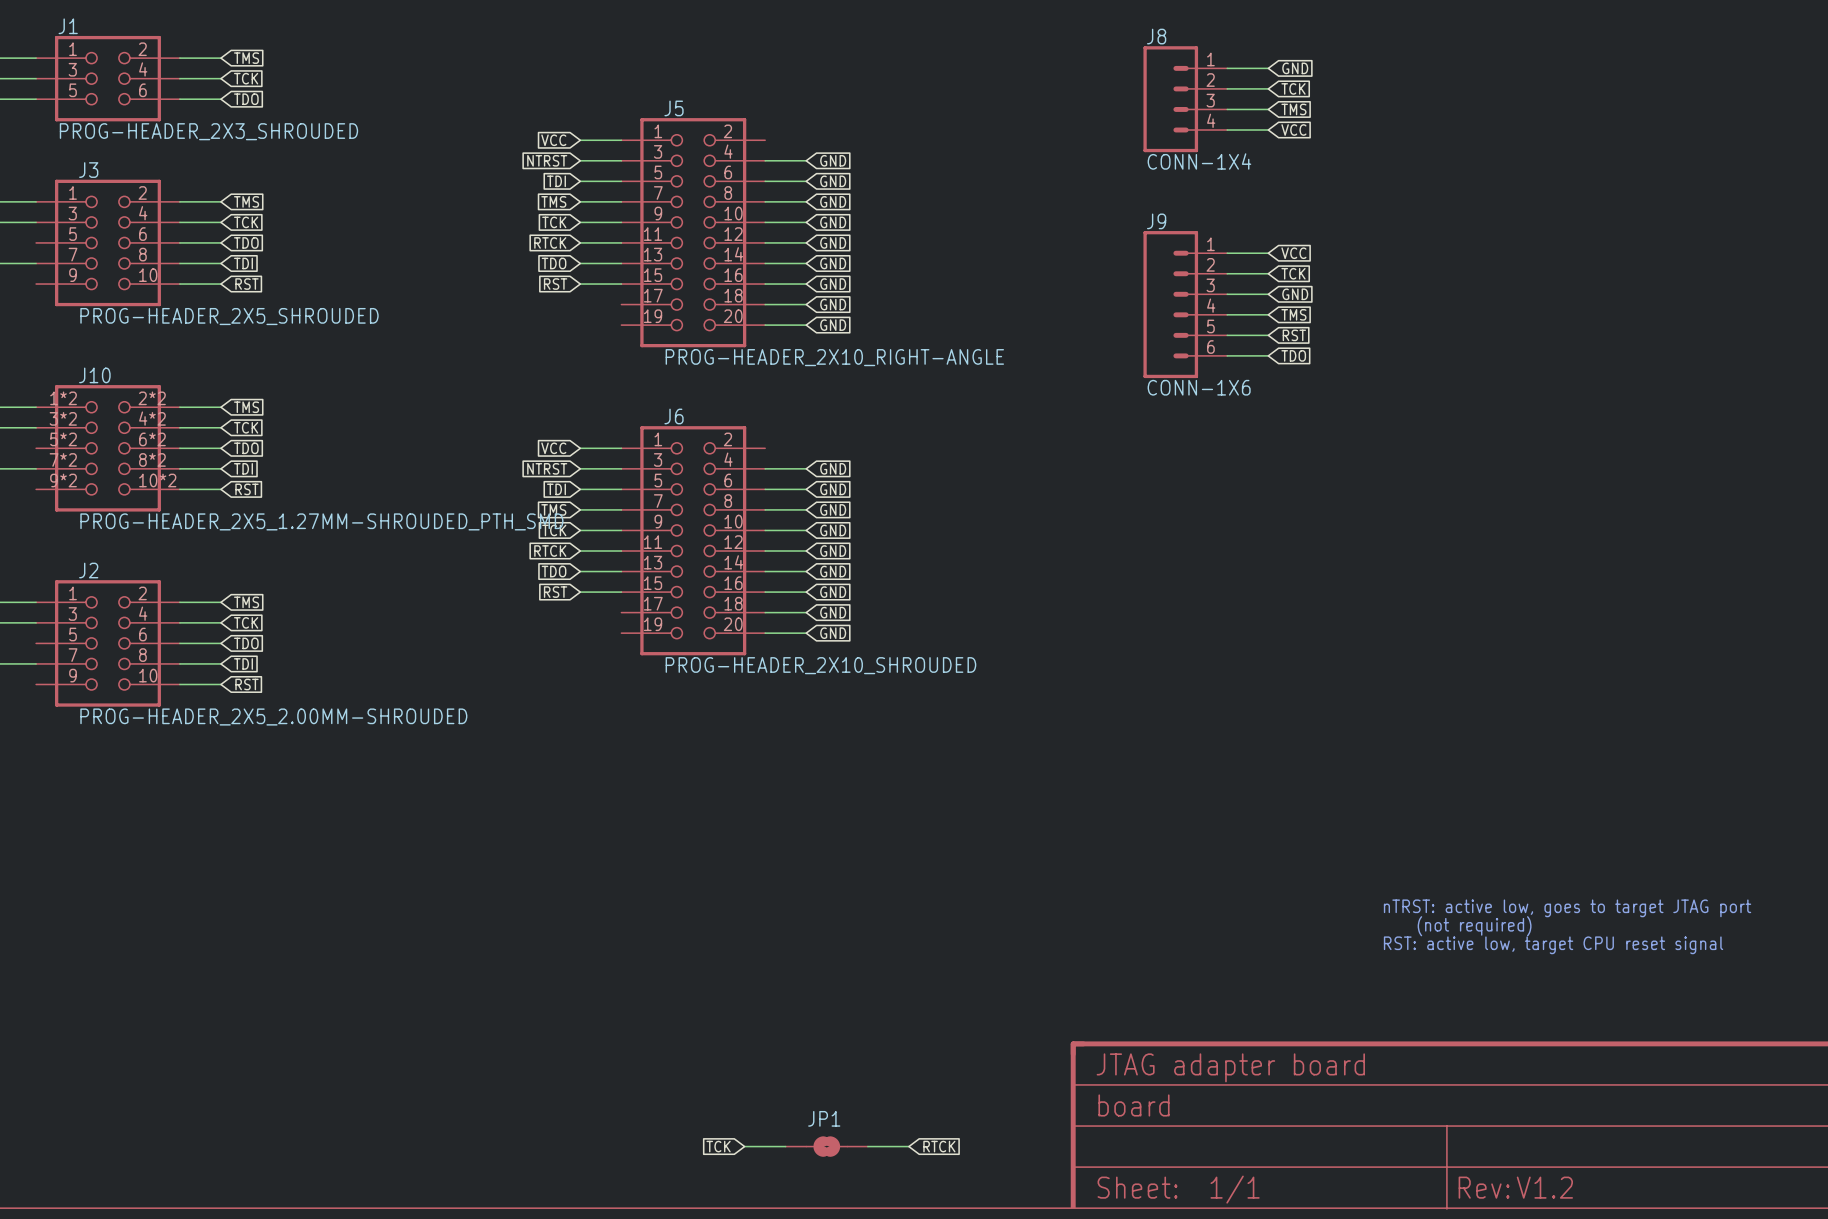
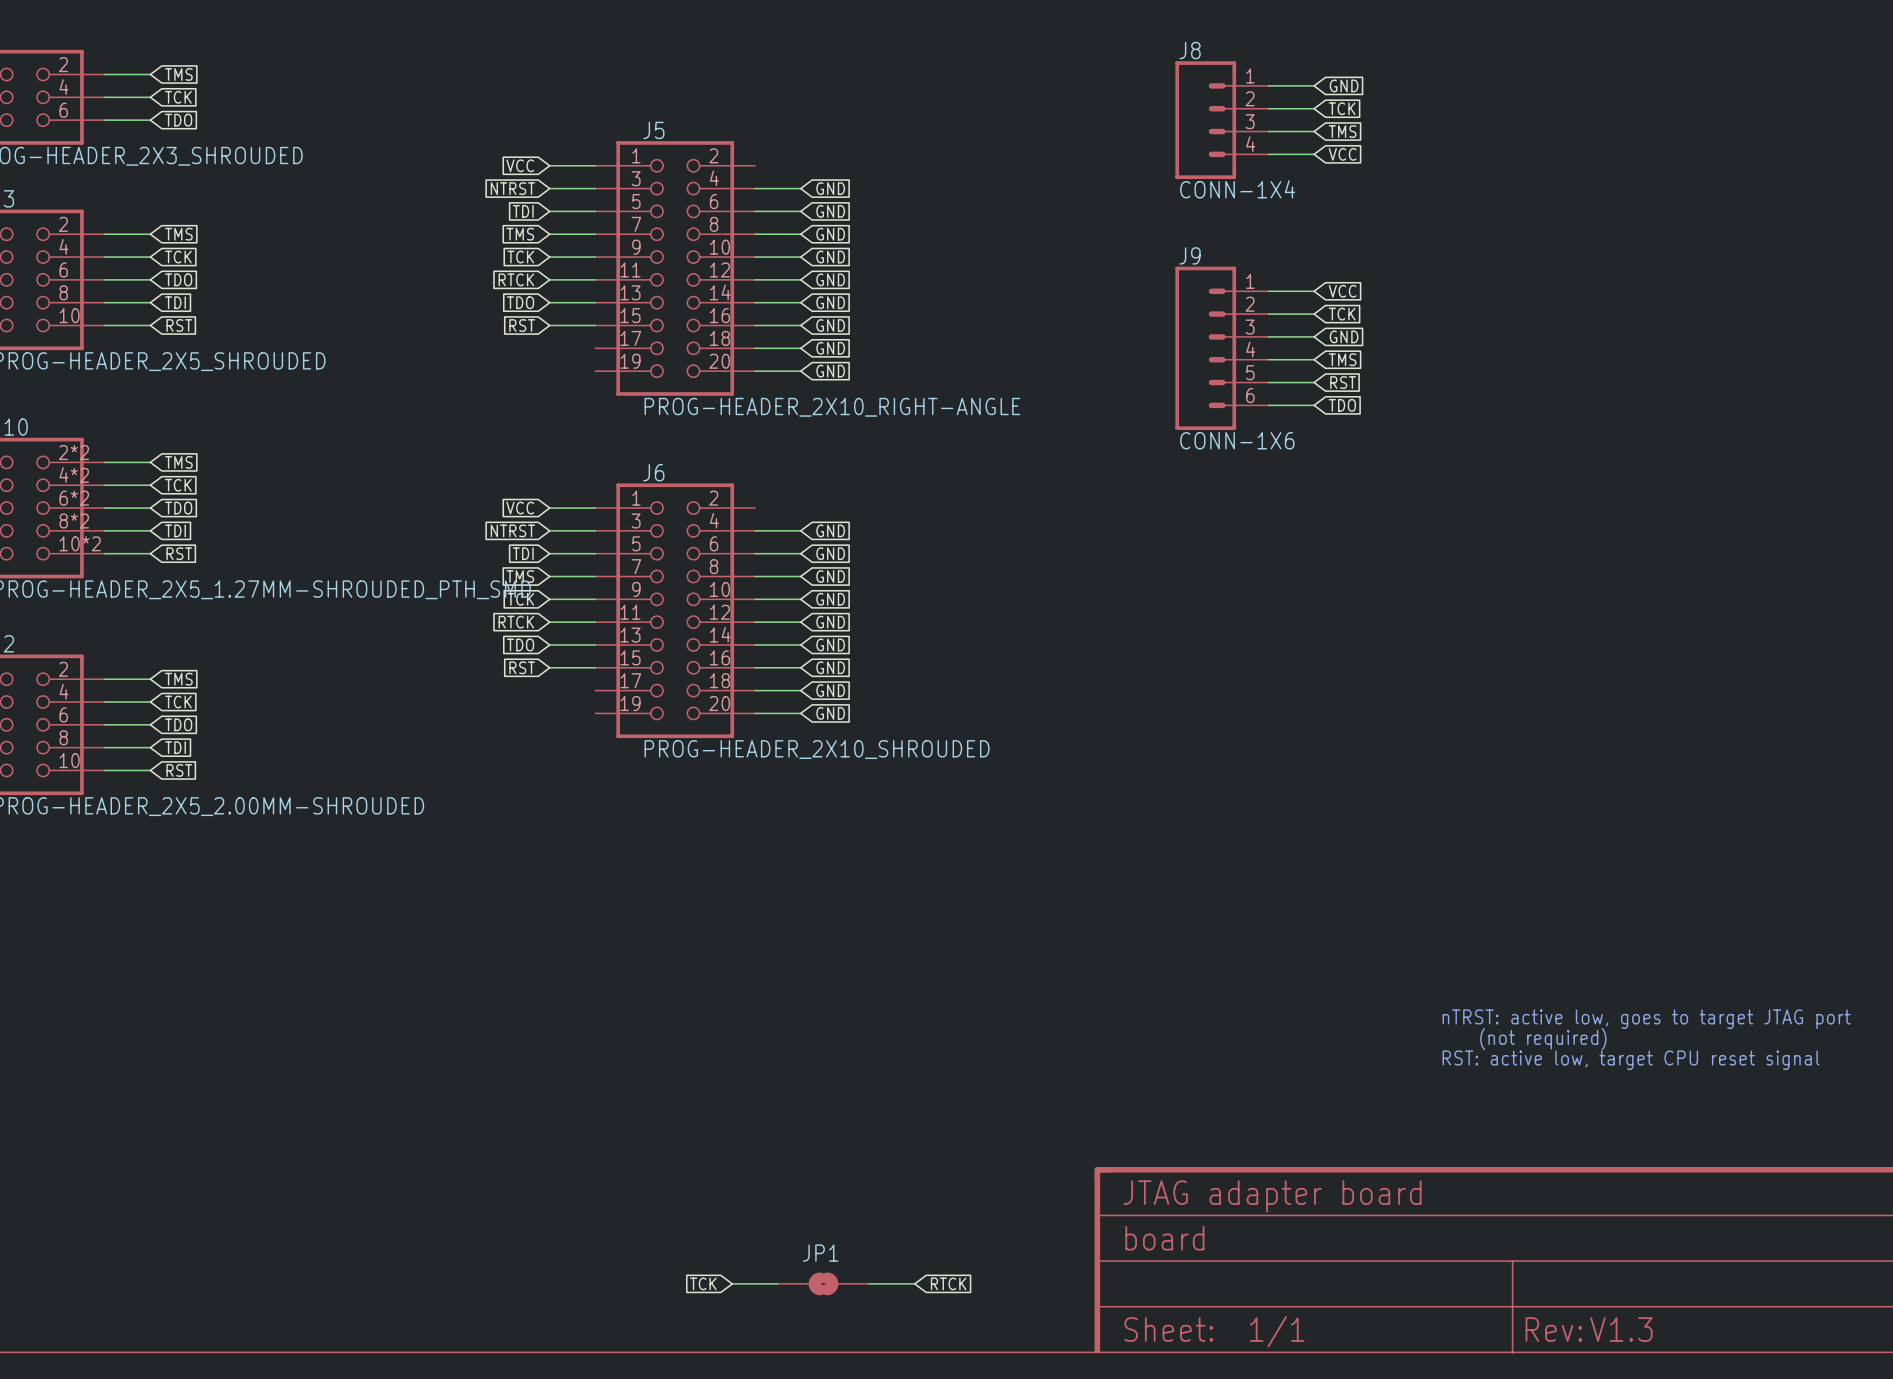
text: V1.2 (1544, 1187) -> V1.3 (1621, 1329)

